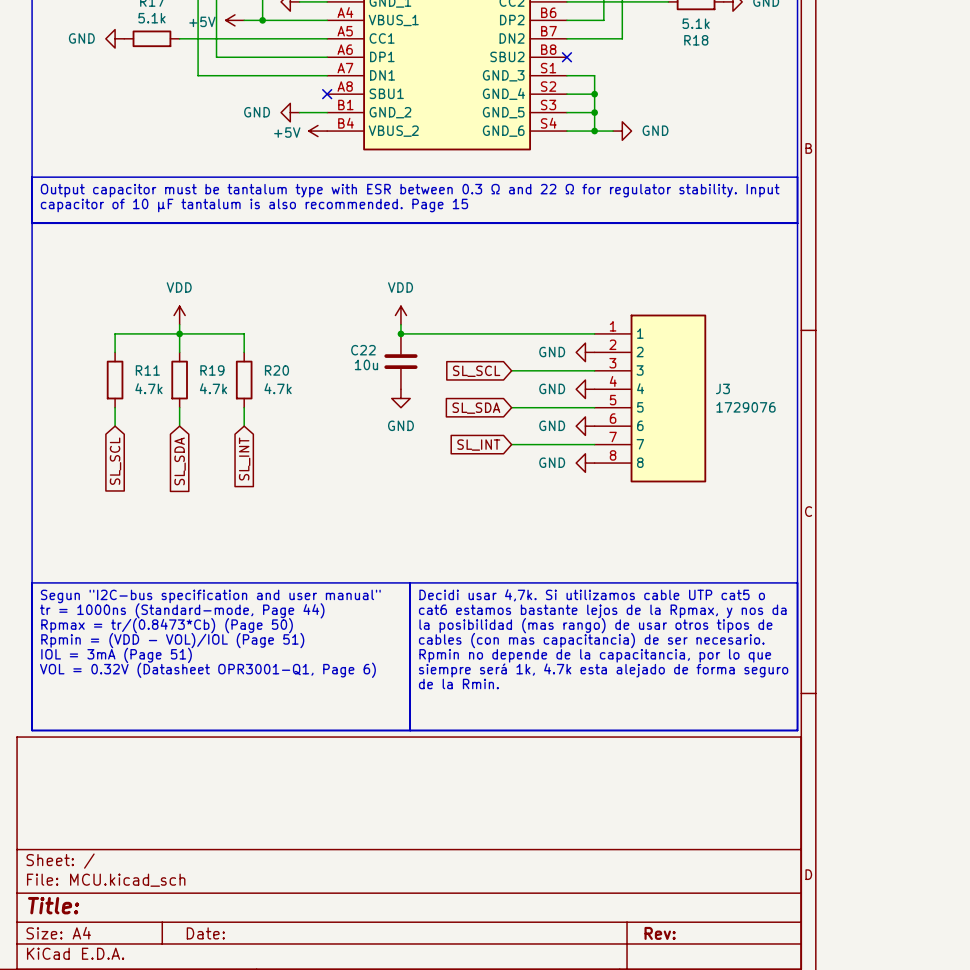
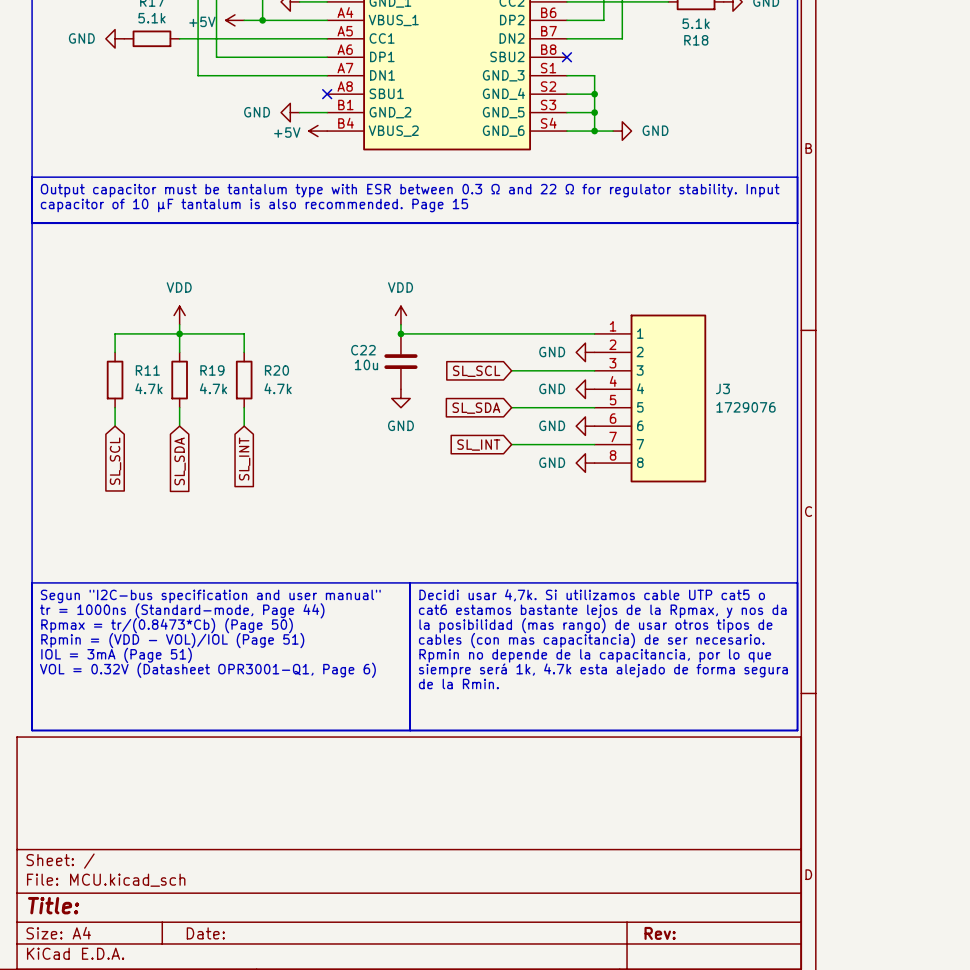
text: siempre será 1k, 4.7k esta alejado de forma seguro (603, 670) -> siempre será 1k, 4.7k esta alejado de forma segura (603, 670)

